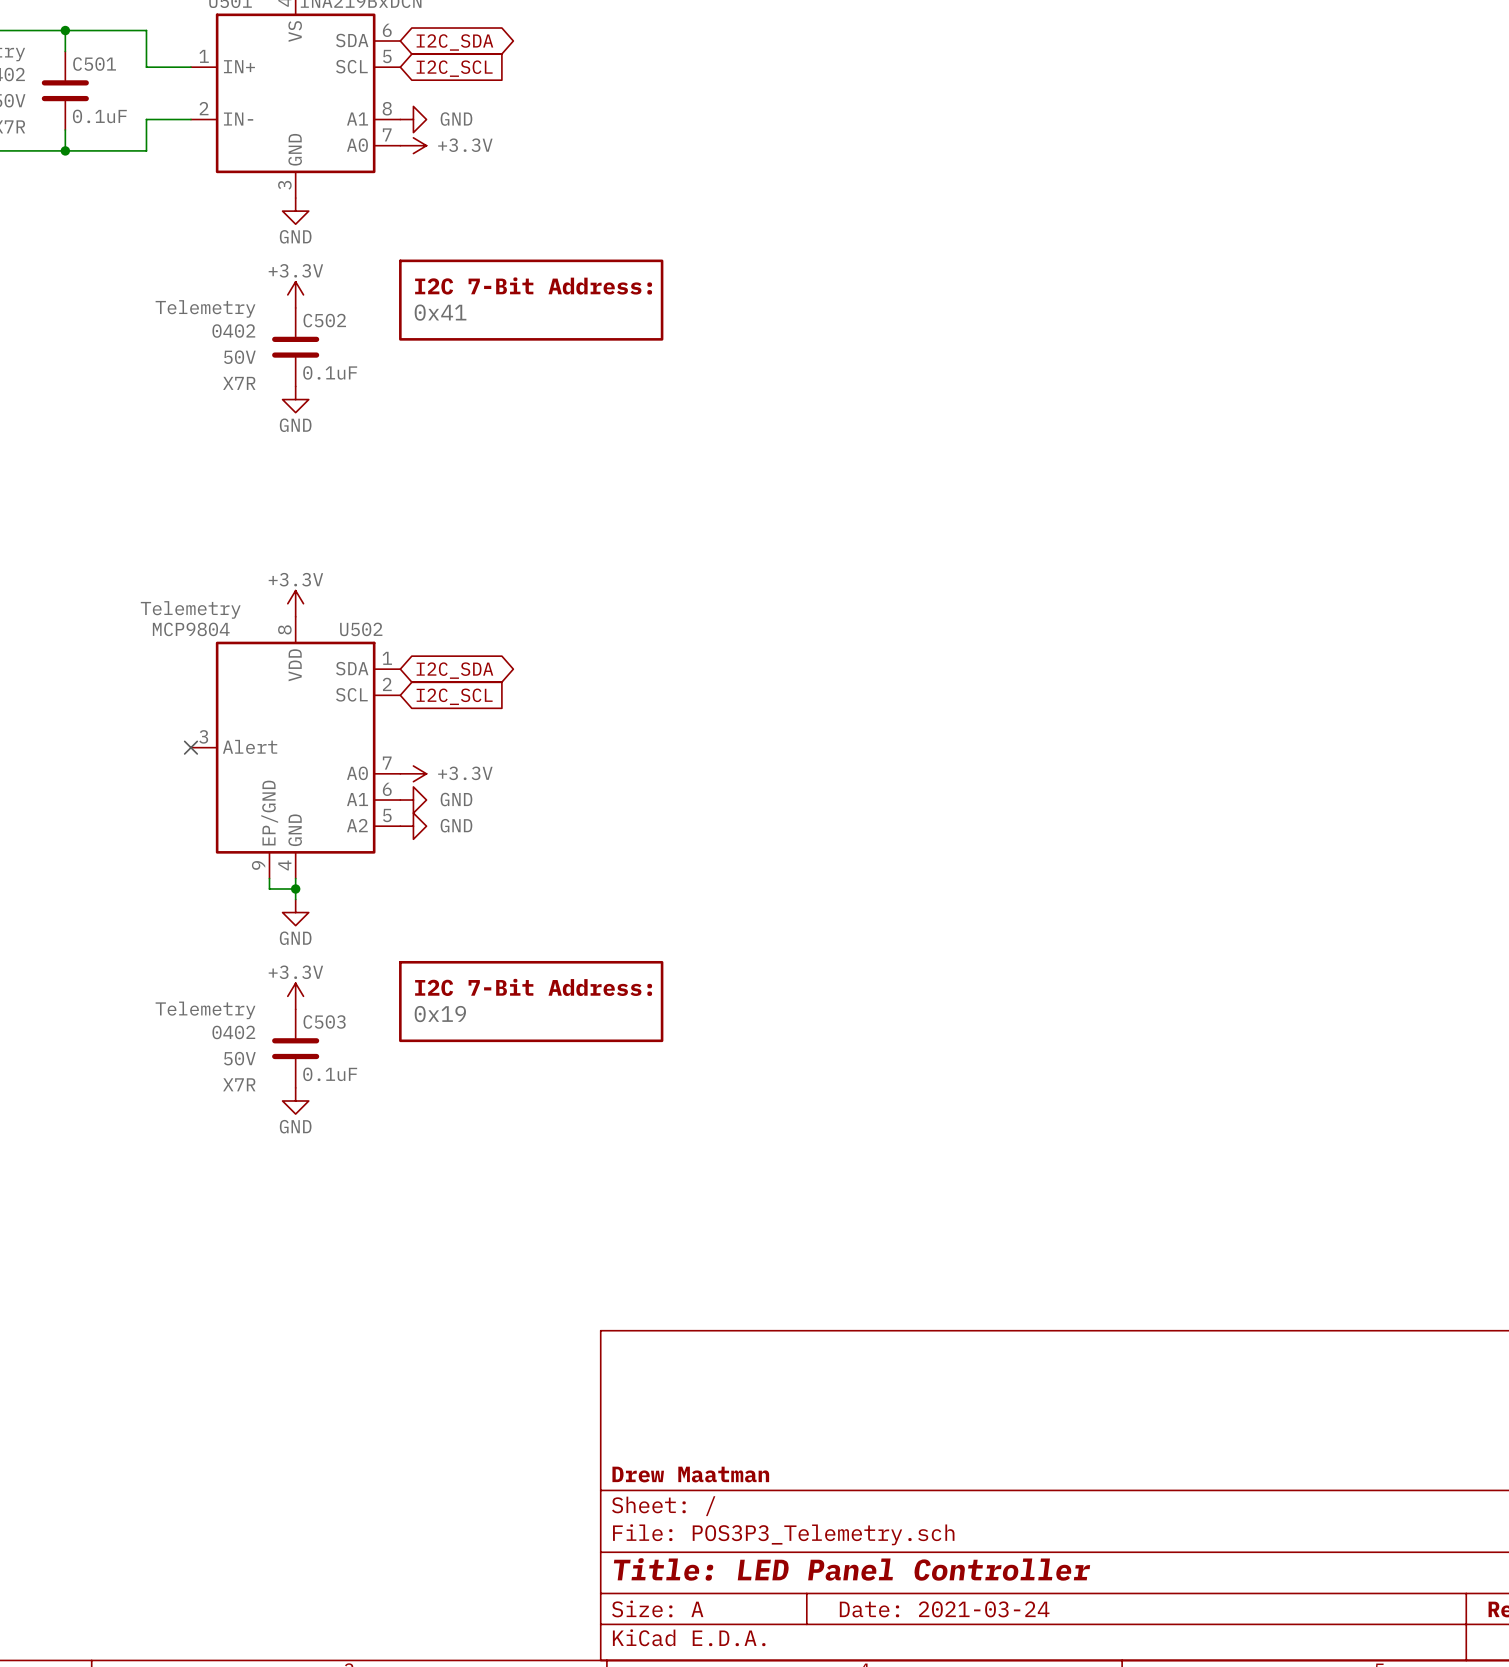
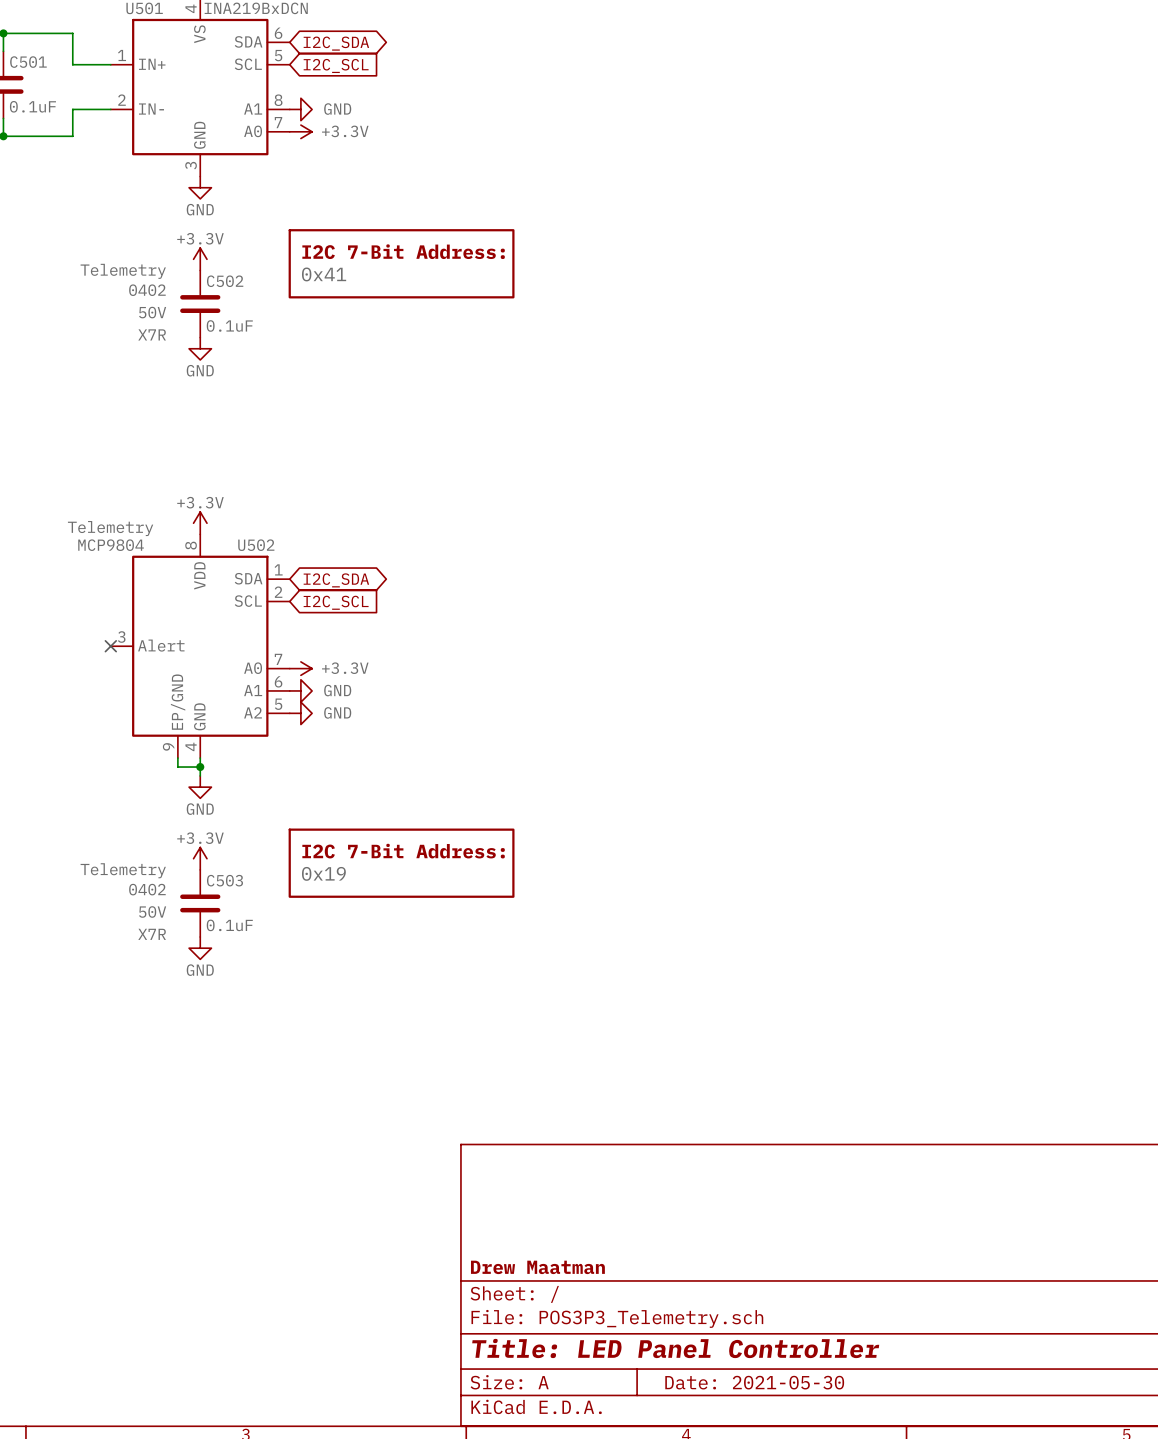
title block: Date: 2021-03-24 (944, 1609) -> Date: 2021-05-30 (754, 1382)

